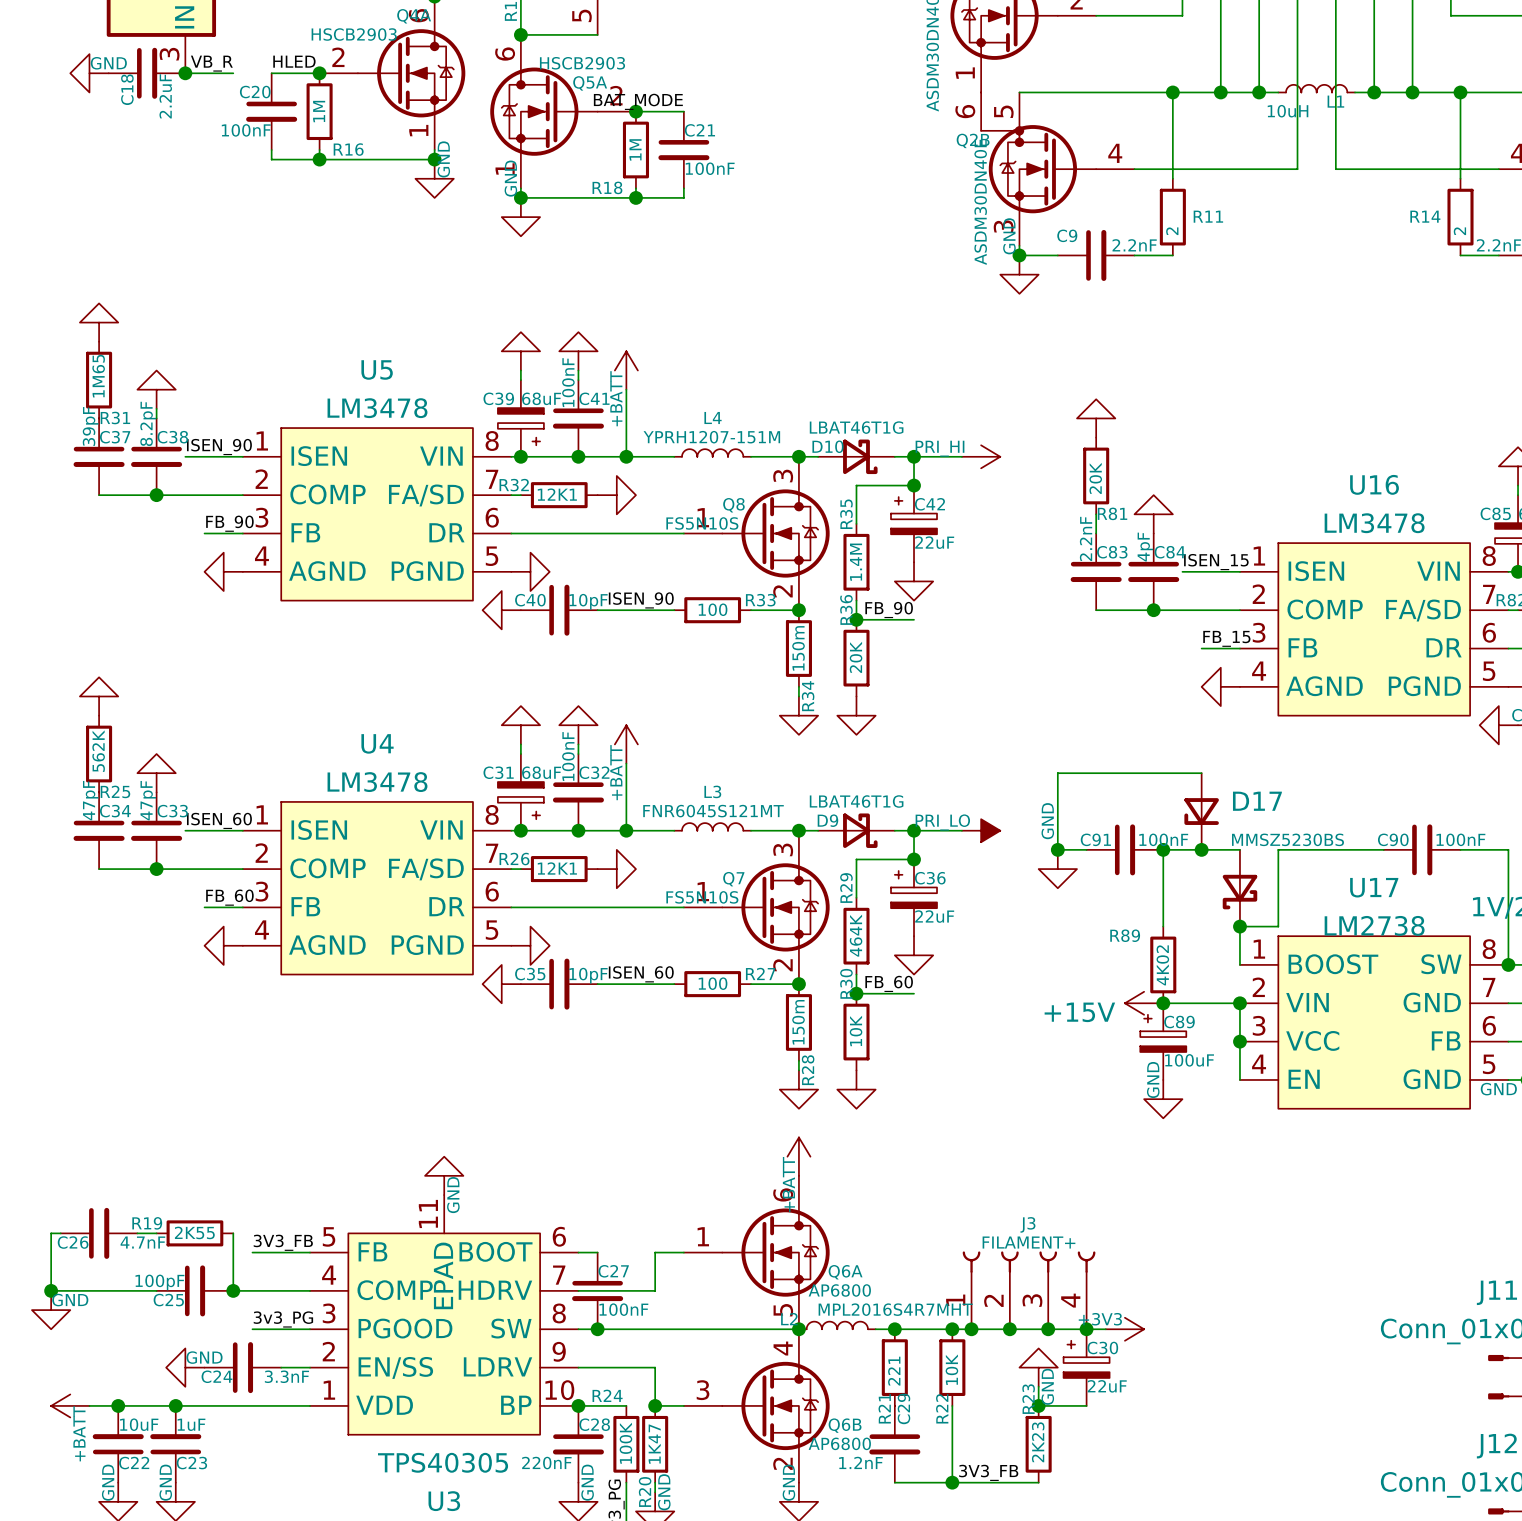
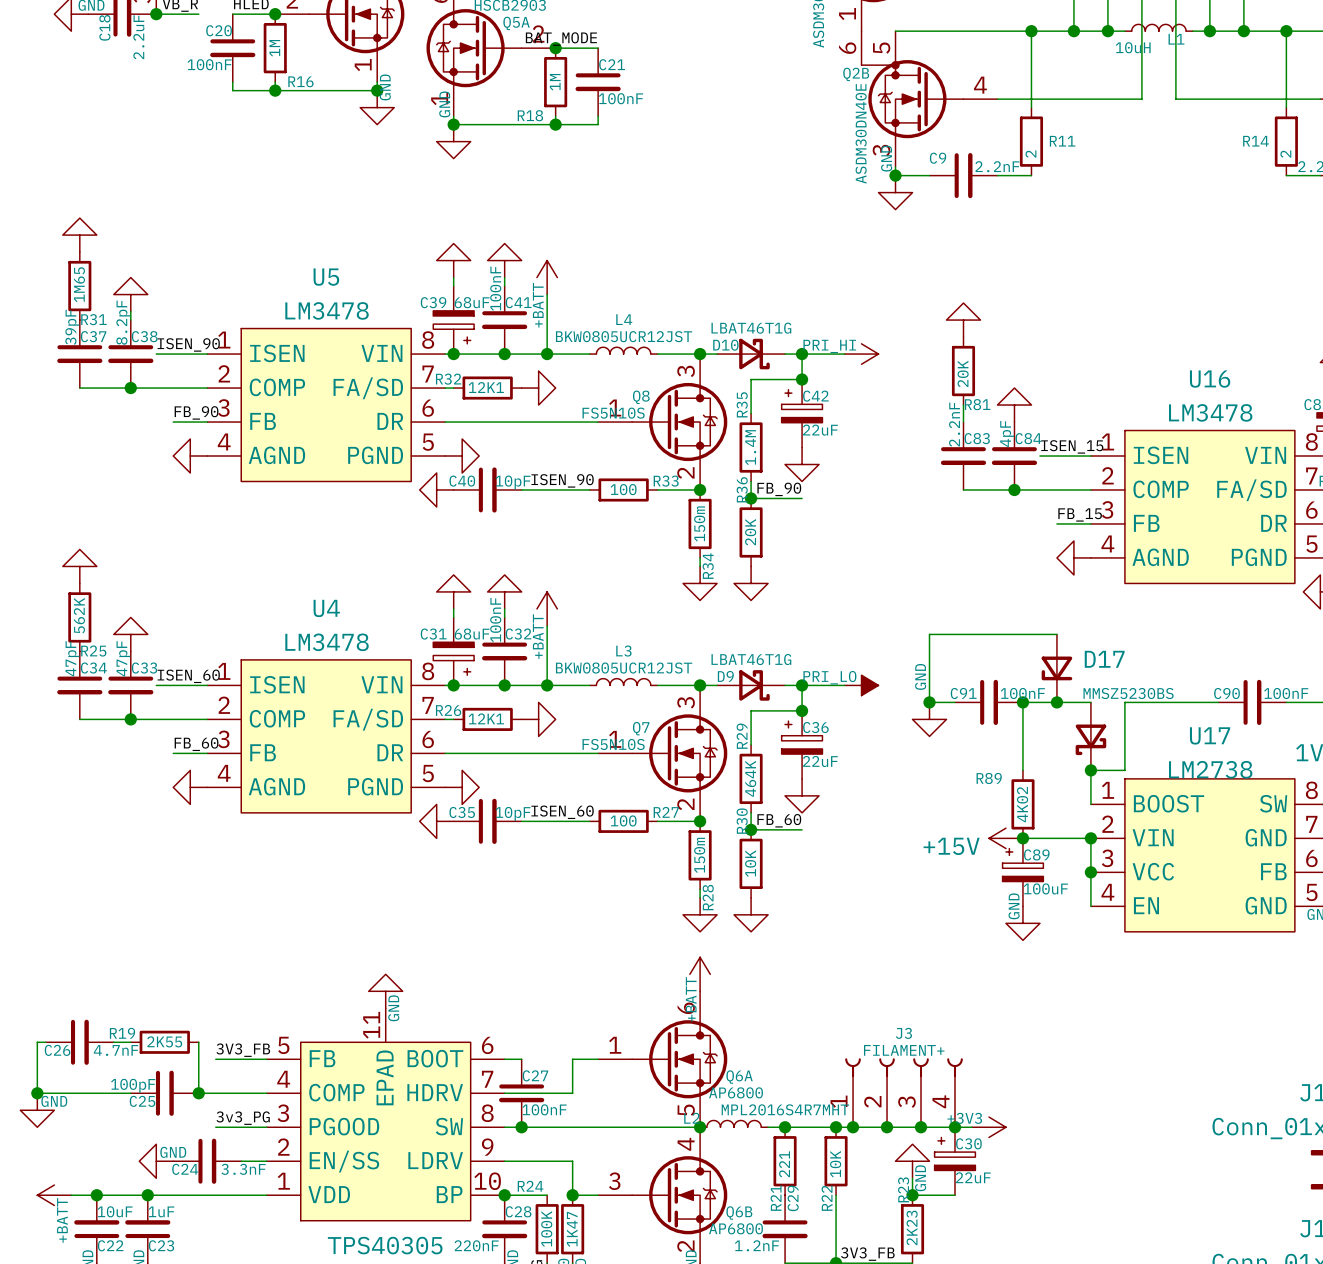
L4 value: YPRH1207-151M (711, 437) -> BKW0805UCR12JST (624, 336)
L3 value: FNR6045S121MT (713, 811) -> BKW0805UCR12JST (624, 668)

